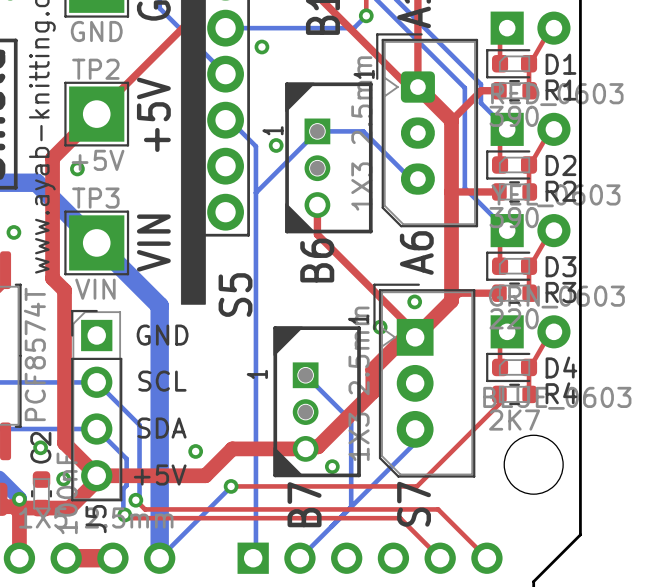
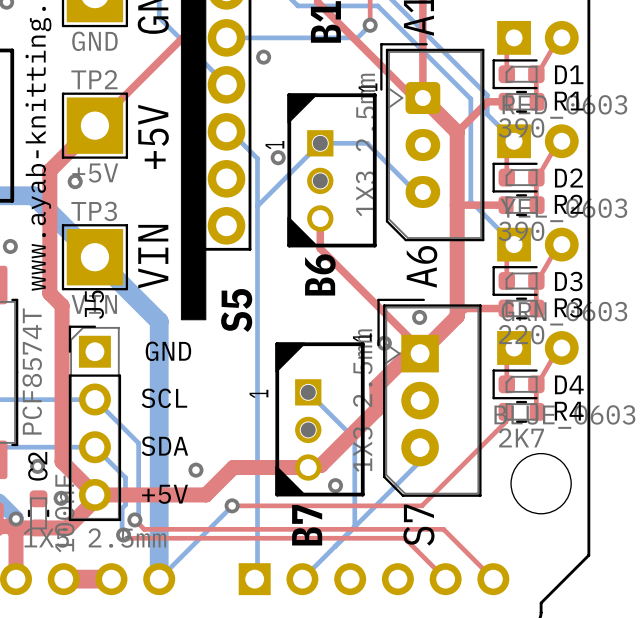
J5 name position: J5 (96, 519) -> J5 (94, 304)

